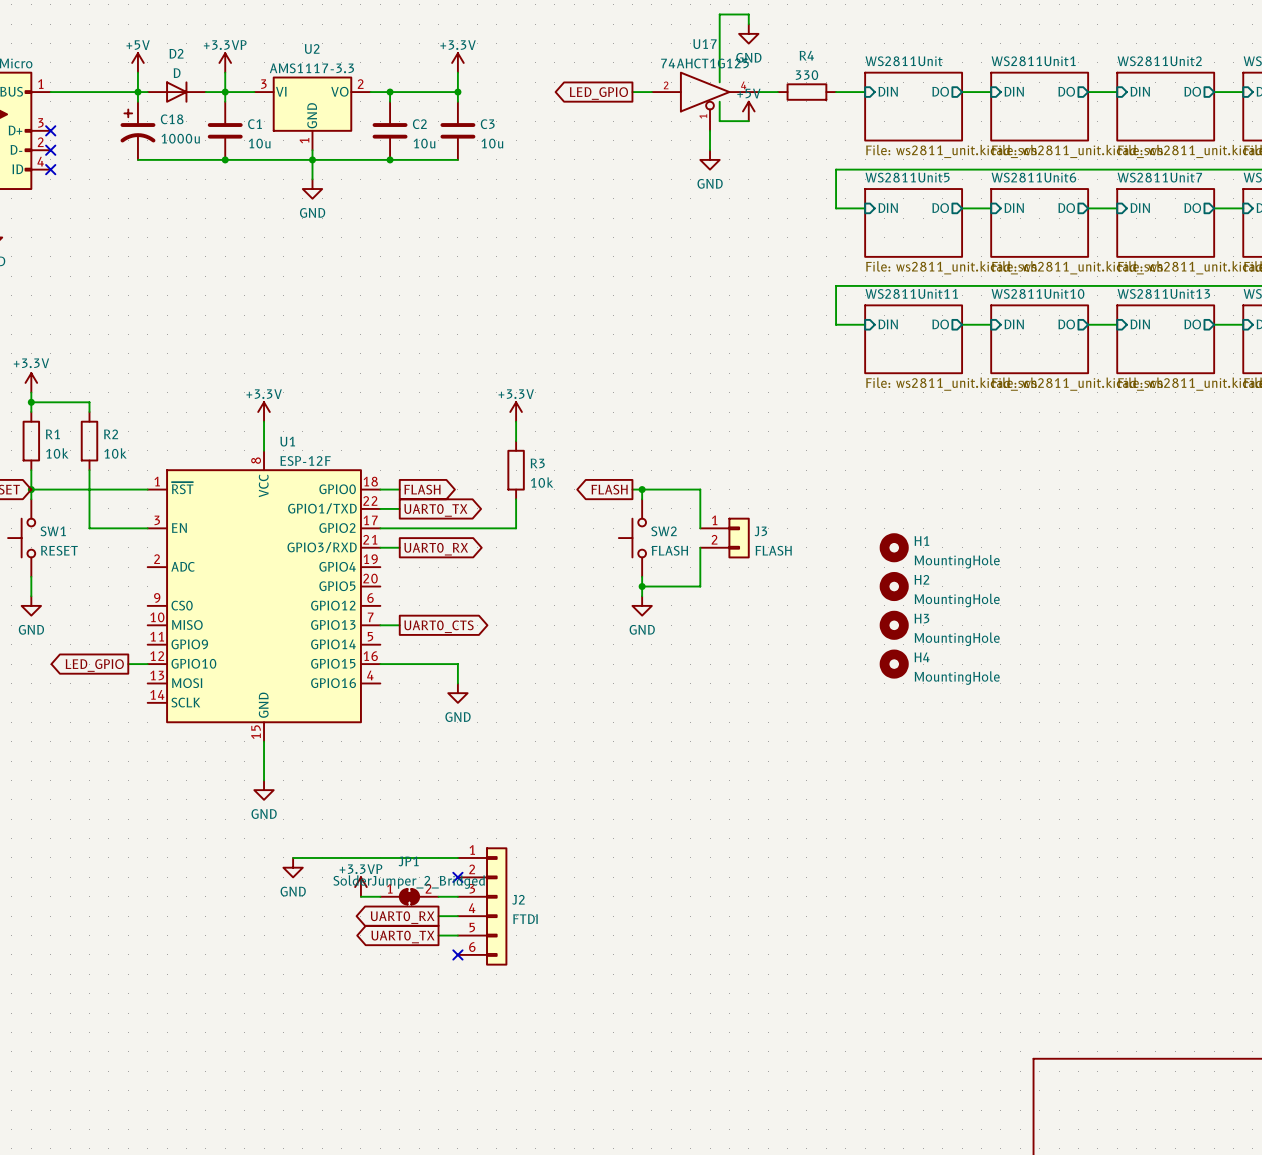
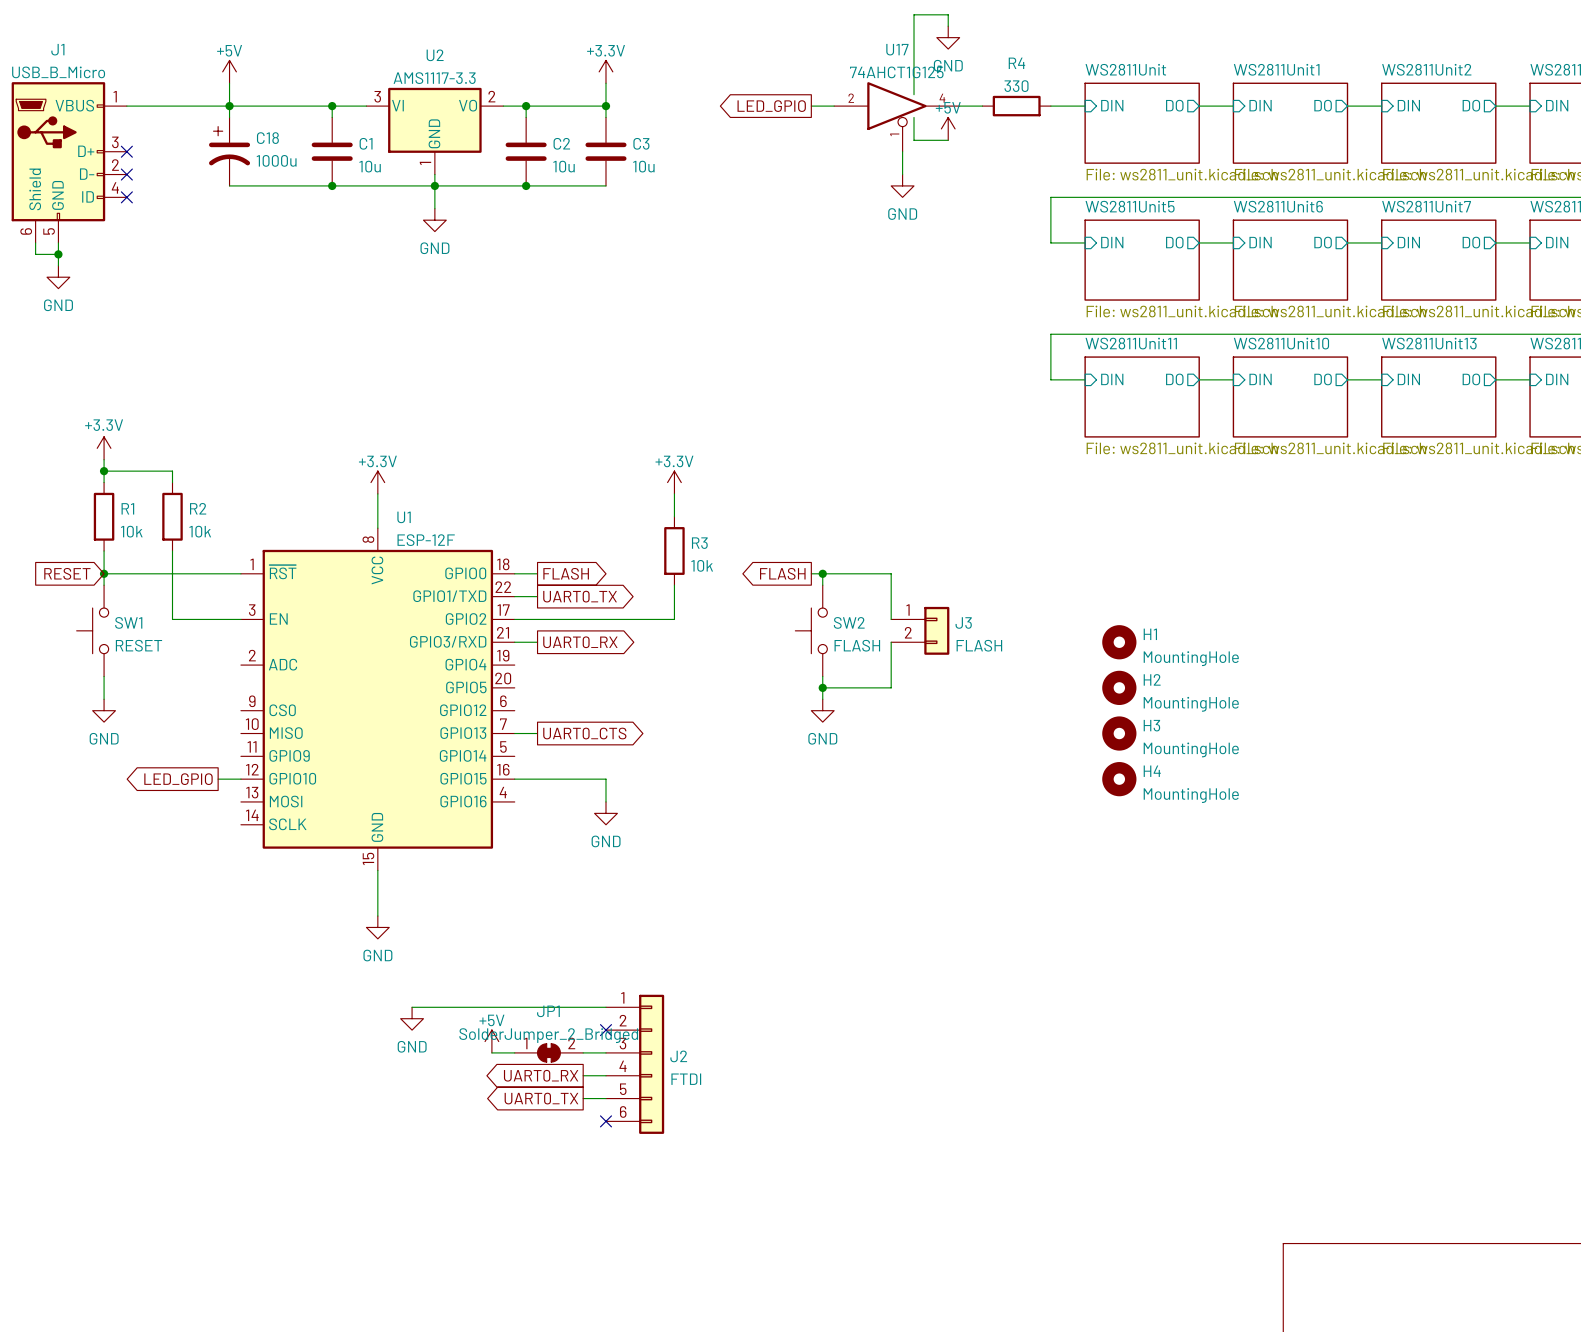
power symbol: +3.3VP (225, 62) -> none
wire: (225, 72) (225, 92) -> none
D2: D (176, 92) -> none
power symbol: +3.3VP (360, 887) -> +5V (491, 1041)

